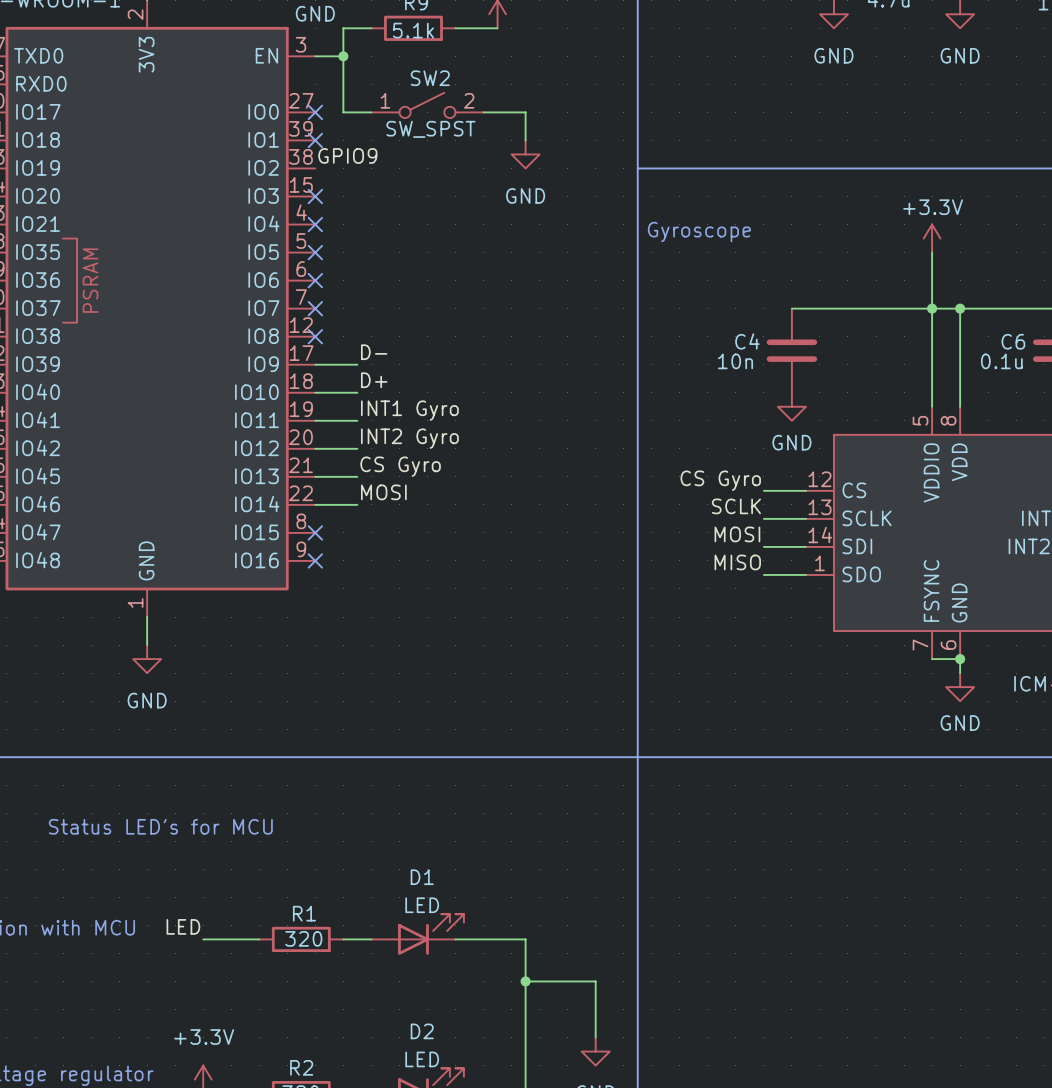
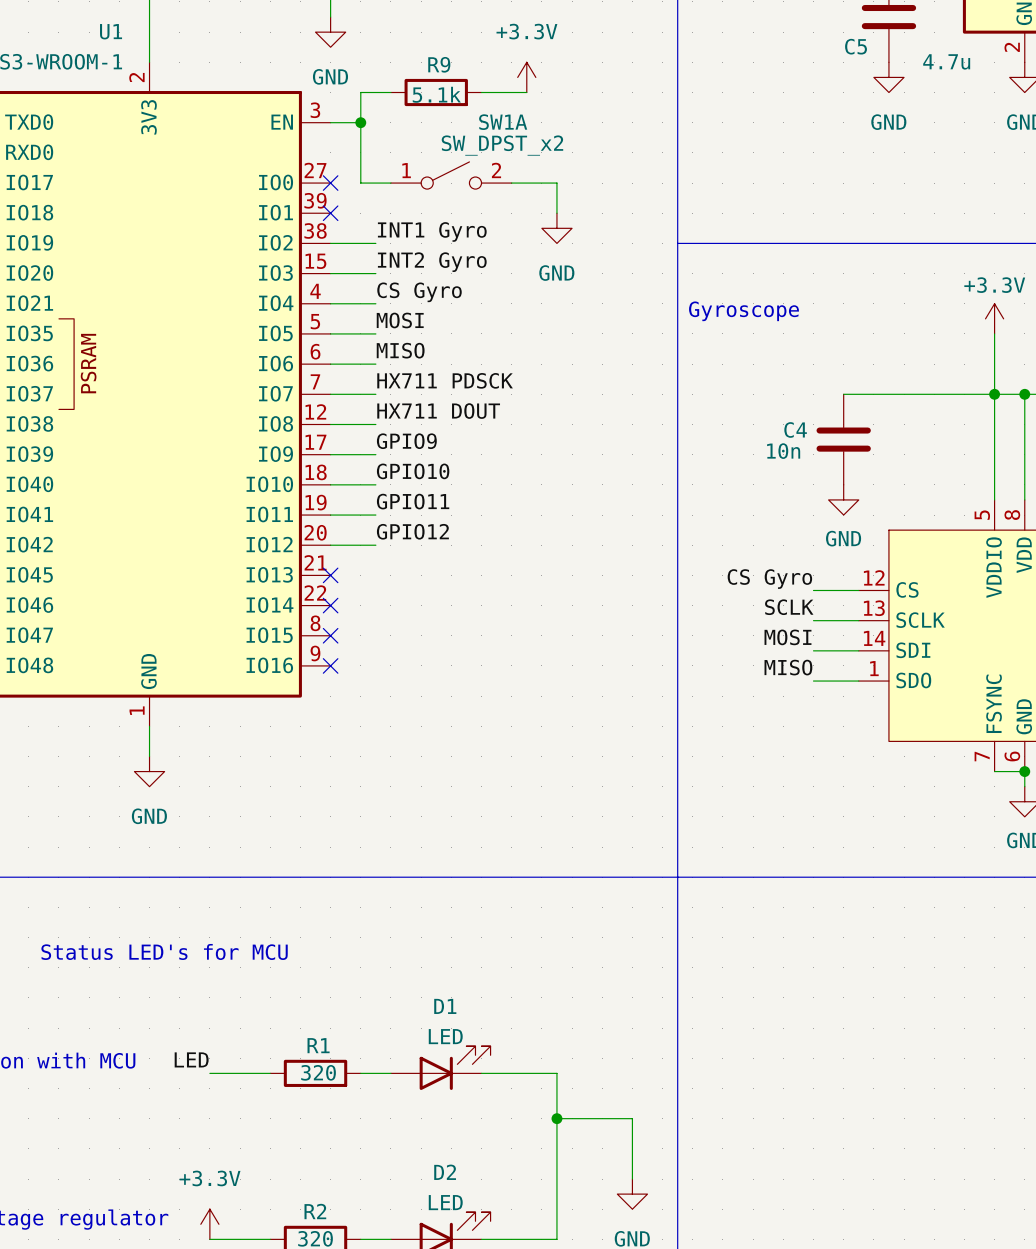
SW2 name: SW2 (430, 78) -> SW1A (503, 122)
SW2 value: SW_SPST (430, 129) -> SW_DPST_x2 (502, 145)
label: GPIO9 (347, 155) -> none
label: none -> INT1 Gyro (432, 231)
wire: none -> (330, 243) (375, 243)
label: none -> INT2 Gyro (432, 262)
wire: none -> (330, 273) (375, 273)
no-connect mark: (315, 196) -> none
wire: none -> (330, 303) (375, 303)
no-connect mark: (315, 224) -> none
wire: none -> (330, 333) (375, 333)
no-connect mark: (315, 252) -> none
label: none -> MISO (400, 350)
wire: none -> (330, 364) (375, 364)
no-connect mark: (315, 280) -> none
label: none -> HX711 PDSCK (445, 380)
no-connect mark: (315, 308) -> none
label: none -> HX711 DOUT (438, 411)
no-connect mark: (315, 336) -> none
label: D- (374, 352) -> GPIO9 (406, 441)
label: D+ (374, 380) -> GPIO10 (413, 471)
label: INT1 Gyro (409, 410) -> GPIO11 (413, 501)
label: INT2 Gyro (409, 438) -> GPIO12 (412, 531)
label position: CS Gyro (400, 466) -> CS Gyro (419, 292)
wire: (315, 476) (357, 476) -> (330, 394) (375, 394)
no-connect mark: none -> (330, 575)
label position: MOSI (383, 492) -> MOSI (400, 320)
wire: (315, 504) (357, 504) -> (330, 424) (375, 424)
no-connect mark: none -> (330, 605)

